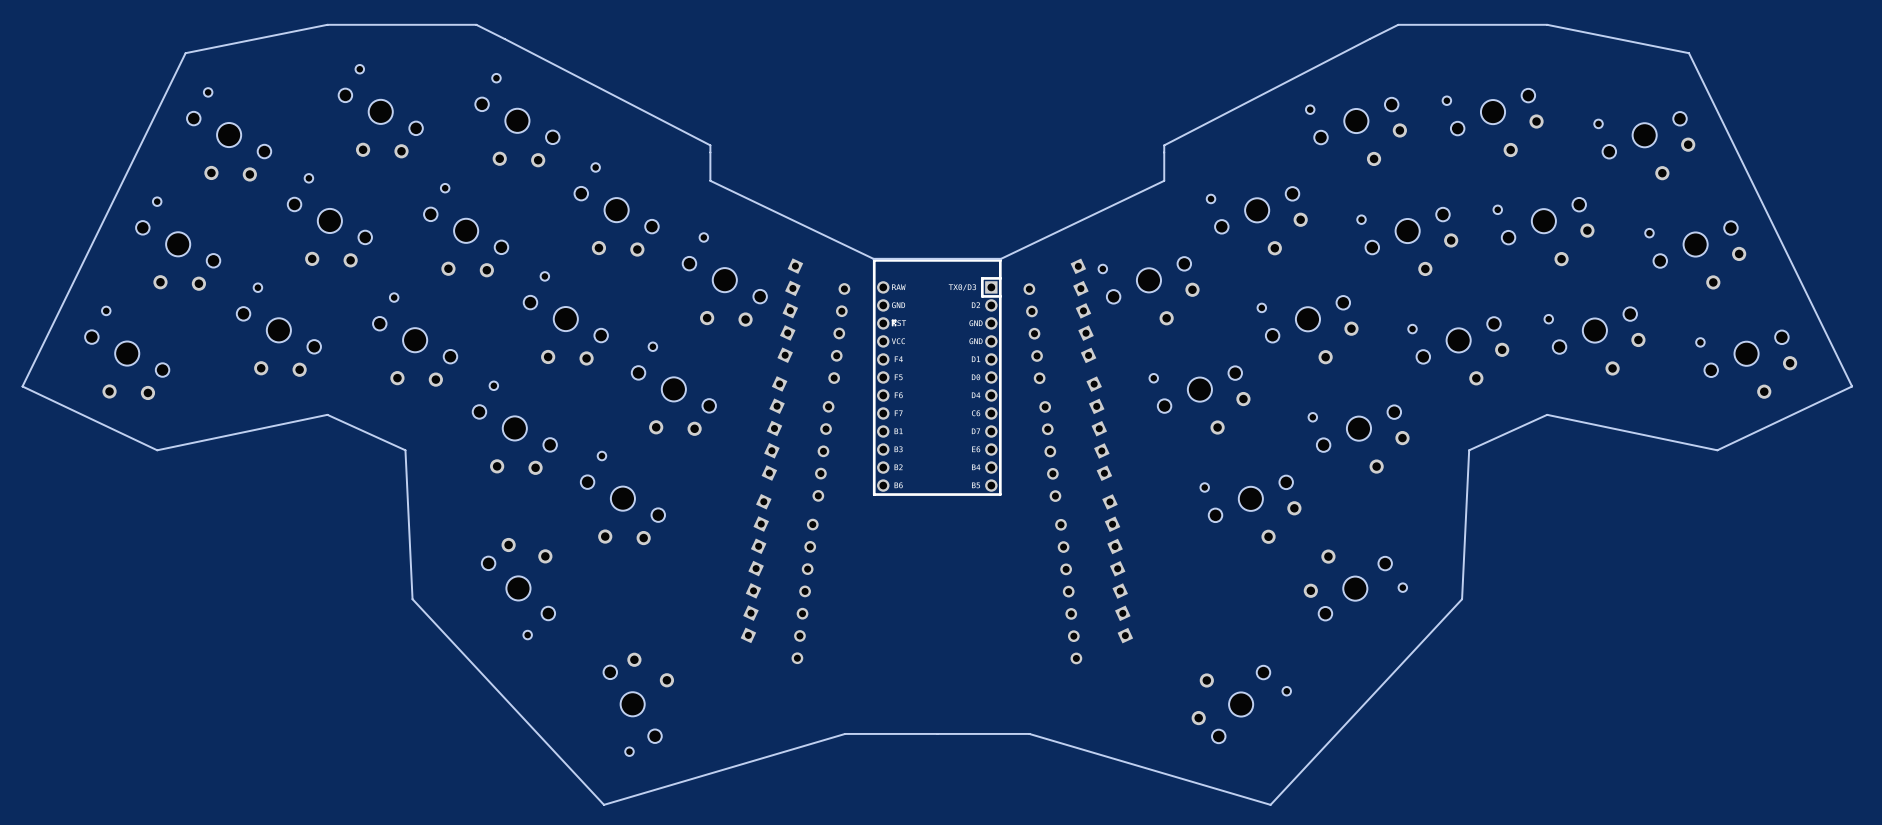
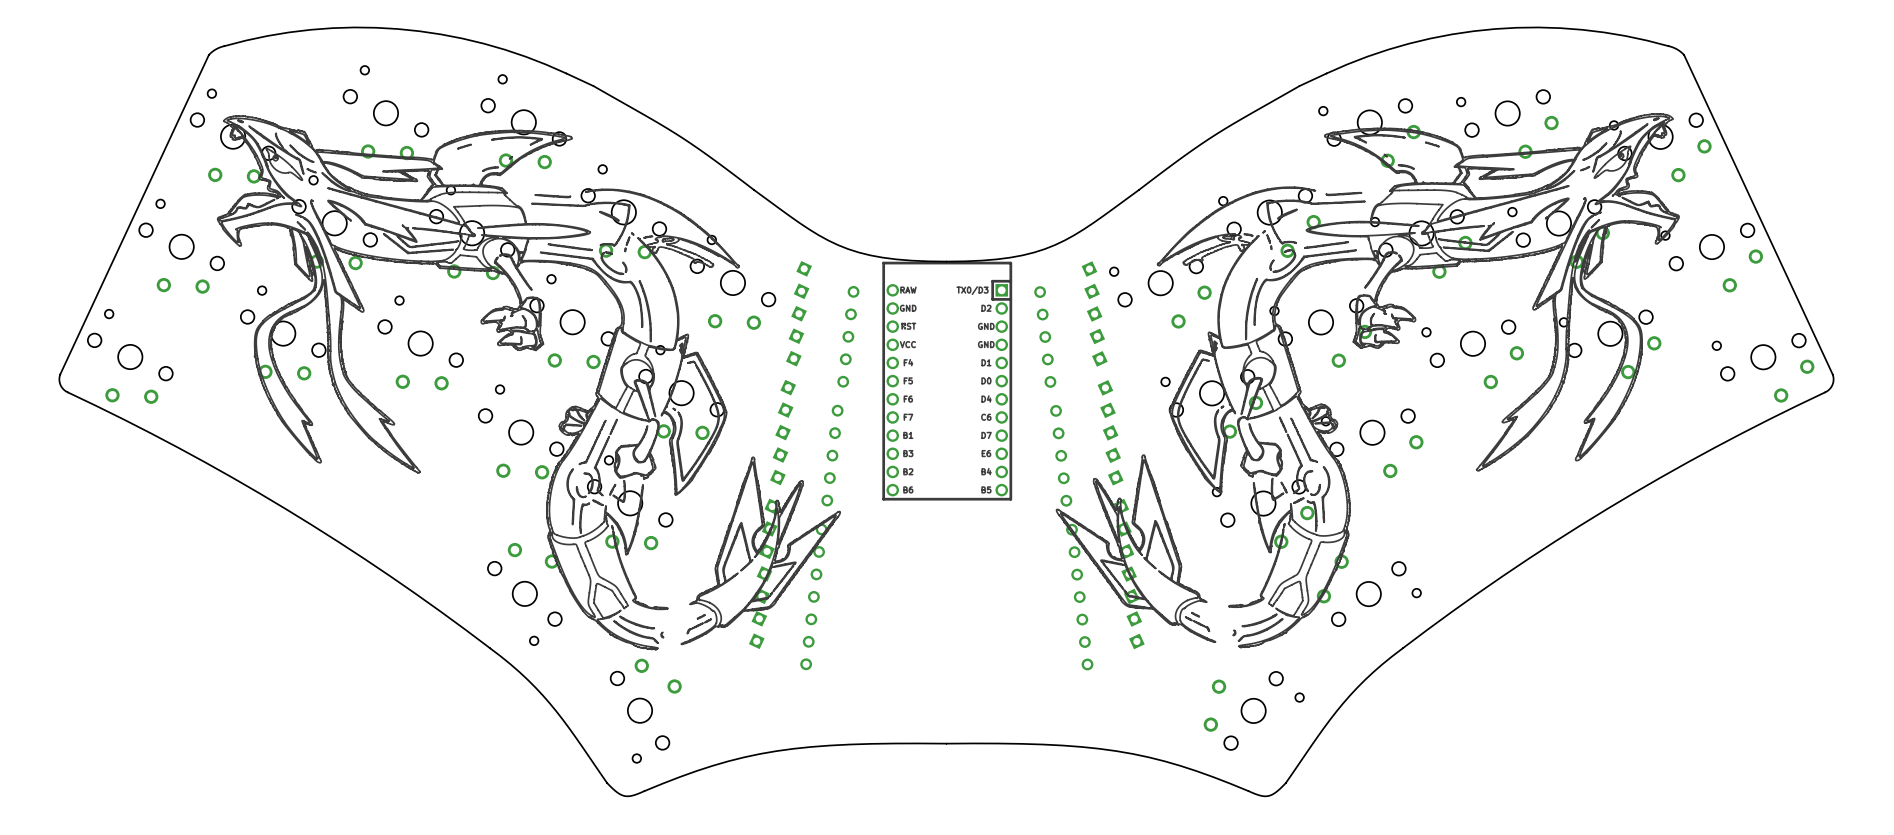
board edge: (1547, 24) (1689, 53) (1852, 386) (1717, 450) (1547, 414) (1469, 450) (1462, 599) (1270, 804) (1029, 733) (845, 733) (604, 804) (412, 599) (405, 450) (327, 414) (157, 450) (22, 386) (185, 53) (327, 24) (476, 24) (710, 145) (710, 180) (873, 258) (1001, 258) (1164, 180) (1164, 145) (1398, 24) (1547, 24) -> (1668, 46) (1684, 54) (1832, 374) (1831, 386) (1826, 391) (1741, 433) (1633, 493) (1528, 558) (1452, 611) (1392, 656) (1357, 687) (1330, 719) (1285, 783) (1276, 792) (1268, 796) (1257, 794) (1180, 765) (1132, 753) (1062, 745) (973, 743) (849, 744) (776, 751) (728, 761) (679, 777) (635, 794) (622, 795) (607, 783) (562, 719) (535, 687) (510, 664) (465, 629) (389, 575) (285, 509) (178, 447) (66, 391) (59, 382) (60, 374) (208, 54) (221, 47) (267, 36) (310, 29) (376, 27) (441, 34) (504, 49) (546, 64) (593, 86) (659, 123) (699, 149) (799, 222) (828, 240) (858, 252) (882, 257) (946, 261) (1010, 257) (1034, 252) (1064, 240) (1093, 222) (1193, 149) (1233, 123) (1299, 86) (1346, 64) (1388, 49) (1451, 34) (1495, 29) (1538, 27) (1604, 32) (1668, 46)
line: none -> (1657, 113) (1640, 115) (1613, 125) (1592, 129) (1581, 148) (1464, 157) (1459, 147) (1452, 141) (1415, 130) (1375, 128) (1325, 134) (1326, 137) (1348, 142) (1367, 151) (1396, 172) (1406, 172) (1411, 175) (1414, 180) (1415, 182) (1393, 187) (1389, 191) (1391, 192) (1374, 207) (1371, 220) (1375, 207) (1379, 205) (1402, 203) (1442, 204) (1422, 232) (1422, 234) (1427, 233) (1433, 246) (1419, 247) (1411, 237) (1398, 235) (1414, 232) (1351, 235) (1309, 230) (1323, 225) (1349, 222) (1369, 222) (1418, 225) (1417, 225) (1370, 221) (1354, 221) (1325, 224) (1307, 229) (1306, 230) (1308, 231) (1322, 234) (1368, 237) (1375, 258) (1328, 260) (1311, 264) (1301, 269) (1285, 285) (1275, 302) (1272, 314) (1274, 329) (1248, 343) (1223, 347) (1219, 329) (1219, 312) (1223, 291) (1230, 272) (1243, 252) (1258, 235) (1249, 243) (1239, 240) (1241, 236) (1234, 234) (1212, 237) (1191, 245) (1162, 260) (1198, 224) (1235, 201) (1256, 193) (1275, 189) (1310, 189) (1294, 187) (1272, 188) (1254, 192) (1236, 199) (1216, 210) (1191, 228) (1157, 263) (1159, 265) (1186, 248) (1217, 236) (1220, 240) (1229, 242) (1201, 251) (1183, 261) (1183, 264) (1186, 264) (1198, 259) (1201, 261) (1202, 257) (1207, 254) (1232, 245) (1237, 245) (1240, 250) (1243, 250) (1232, 267) (1223, 286) (1218, 310) (1219, 336) (1208, 333) (1213, 354) (1198, 350) (1170, 409) (1171, 418) (1181, 441) (1205, 479) (1221, 492) (1227, 439) (1223, 430) (1223, 420) (1229, 412) (1232, 410) (1235, 413) (1220, 376) (1214, 355) (1216, 348) (1215, 342) (1217, 343) (1214, 341) (1214, 350) (1211, 335) (1219, 338) (1222, 346) (1223, 347) (1248, 345) (1251, 353) (1245, 362) (1242, 374) (1243, 380) (1246, 385) (1243, 374) (1249, 362) (1262, 357) (1273, 363) (1274, 368) (1272, 378) (1261, 388) (1273, 410) (1249, 418) (1273, 411) (1296, 396) (1318, 435) (1336, 463) (1344, 485) (1347, 513) (1342, 531) (1323, 535) (1307, 531) (1292, 519) (1290, 504) (1290, 510) (1280, 520) (1275, 528) (1269, 548) (1260, 522) (1253, 483) (1258, 521) (1269, 552) (1276, 529) (1289, 512) (1290, 514) (1288, 523) (1297, 532) (1311, 541) (1298, 573) (1280, 584) (1268, 603) (1272, 606) (1284, 588) (1299, 581) (1302, 600) (1293, 615) (1275, 608) (1287, 615) (1299, 617) (1289, 627) (1274, 636) (1238, 646) (1258, 645) (1281, 635) (1309, 613) (1323, 595) (1336, 569) (1348, 535) (1346, 528) (1349, 504) (1346, 480) (1338, 461) (1317, 431) (1330, 432) (1336, 427) (1337, 423) (1331, 417) (1330, 409) (1325, 405) (1320, 404) (1309, 409) (1301, 402) (1298, 395) (1300, 391) (1299, 387) (1282, 331) (1275, 321) (1277, 303) (1288, 285) (1300, 271) (1317, 264) (1346, 259) (1375, 260) (1379, 265) (1365, 287) (1380, 266) (1386, 254) (1397, 253) (1392, 251) (1386, 253) (1379, 263) (1378, 251) (1383, 242) (1395, 236) (1409, 240) (1413, 248) (1411, 257) (1403, 265) (1392, 270) (1402, 260) (1400, 257) (1398, 255) (1400, 259) (1382, 282) (1374, 301) (1370, 297) (1376, 306) (1363, 311) (1358, 324) (1358, 299) (1361, 296) (1369, 296) (1359, 295) (1357, 299) (1356, 331) (1353, 341) (1360, 348) (1370, 345) (1378, 348) (1385, 342) (1398, 342) (1386, 331) (1386, 329) (1399, 329) (1397, 323) (1400, 319) (1413, 321) (1415, 320) (1403, 307) (1390, 304) (1378, 307) (1377, 304) (1377, 297) (1381, 285) (1391, 272) (1404, 268) (1456, 266) (1463, 260) (1474, 261) (1516, 258) (1542, 253) (1562, 245) (1533, 307) (1535, 309) (1554, 296) (1554, 319) (1556, 335) (1555, 356) (1550, 373) (1534, 393) (1502, 420) (1504, 422) (1513, 419) (1476, 469) (1478, 470) (1494, 461) (1526, 437) (1548, 412) (1558, 394) (1564, 382) (1562, 382) (1568, 362) (1568, 330) (1572, 277) (1575, 288) (1582, 297) (1619, 320) (1624, 328) (1626, 337) (1623, 354) (1616, 372) (1584, 421) (1585, 423) (1592, 420) (1575, 458) (1578, 460) (1596, 441) (1619, 412) (1632, 386) (1642, 354) (1641, 331) (1633, 318) (1583, 287) (1581, 275) (1590, 245) (1584, 279) (1601, 262) (1603, 240) (1607, 226) (1624, 222) (1655, 226) (1658, 232) (1656, 243) (1672, 229) (1678, 217) (1678, 215) (1668, 211) (1651, 192) (1632, 191) (1617, 193) (1620, 190) (1628, 187) (1627, 179) (1637, 176) (1635, 170) (1636, 164) (1654, 135) (1662, 137) (1666, 134) (1663, 126) (1672, 118) (1667, 114) (1657, 113)
line: none -> (239, 116) (255, 117) (283, 127) (304, 131) (315, 150) (432, 159) (436, 150) (444, 144) (481, 132) (520, 130) (570, 136) (570, 139) (548, 144) (528, 153) (500, 174) (490, 174) (485, 177) (482, 182) (481, 184) (503, 189) (506, 193) (504, 195) (521, 209) (525, 222) (521, 209) (517, 207) (493, 205) (454, 206) (474, 234) (474, 236) (469, 235) (463, 248) (476, 249) (485, 240) (498, 237) (481, 235) (545, 237) (587, 232) (573, 227) (547, 224) (527, 224) (478, 228) (478, 227) (526, 223) (542, 223) (570, 226) (589, 231) (590, 232) (588, 233) (573, 236) (528, 239) (521, 260) (568, 262) (585, 266) (595, 271) (611, 288) (621, 304) (624, 316) (622, 331) (648, 345) (673, 349) (677, 332) (677, 314) (673, 293) (666, 275) (653, 255) (638, 238) (647, 245) (657, 242) (655, 238) (661, 236) (683, 239) (705, 247) (733, 262) (697, 226) (661, 203) (640, 195) (621, 191) (586, 191) (602, 189) (623, 190) (642, 194) (660, 201) (680, 212) (704, 231) (739, 265) (737, 267) (709, 251) (679, 239) (675, 242) (666, 244) (695, 254) (713, 263) (712, 266) (710, 267) (698, 261) (695, 263) (694, 259) (689, 256) (664, 247) (659, 247) (656, 253) (652, 252) (664, 269) (673, 288) (678, 312) (677, 338) (688, 335) (683, 356) (697, 353) (726, 411) (724, 420) (714, 443) (691, 481) (675, 495) (669, 441) (673, 432) (673, 422) (667, 414) (664, 412) (661, 415) (676, 379) (681, 357) (679, 350) (681, 344) (679, 345) (682, 343) (682, 353) (685, 337) (676, 340) (674, 348) (673, 349) (648, 347) (645, 355) (651, 364) (654, 376) (653, 383) (650, 387) (653, 377) (647, 364) (634, 359) (623, 366) (622, 370) (624, 380) (635, 390) (623, 412) (647, 420) (623, 413) (600, 398) (578, 437) (559, 465) (552, 487) (549, 516) (554, 533) (573, 538) (589, 533) (604, 521) (605, 506) (606, 512) (616, 522) (621, 530) (627, 551) (636, 524) (643, 485) (637, 524) (627, 554) (620, 531) (607, 514) (606, 516) (608, 525) (599, 534) (585, 543) (598, 575) (616, 586) (627, 605) (624, 608) (612, 590) (597, 583) (593, 602) (603, 617) (620, 610) (609, 617) (597, 619) (607, 629) (622, 638) (658, 648) (638, 647) (615, 637) (587, 615) (573, 597) (559, 571) (548, 537) (549, 530) (546, 506) (550, 483) (557, 463) (578, 433) (566, 434) (560, 430) (559, 425) (565, 419) (566, 411) (571, 407) (576, 406) (587, 411) (595, 404) (598, 397) (596, 394) (596, 389) (614, 333) (621, 323) (619, 305) (607, 287) (595, 273) (579, 266) (549, 262) (521, 262) (517, 267) (531, 289) (516, 268) (510, 256) (499, 255) (504, 254) (509, 255) (516, 265) (518, 253) (512, 244) (501, 238) (487, 242) (483, 251) (485, 259) (493, 268) (504, 272) (494, 262) (495, 259) (498, 257) (496, 261) (514, 284) (522, 303) (526, 299) (520, 308) (533, 313) (538, 326) (538, 301) (535, 298) (526, 298) (537, 297) (539, 301) (540, 333) (543, 344) (535, 350) (526, 347) (518, 350) (511, 345) (497, 344) (510, 333) (510, 331) (497, 331) (499, 325) (496, 322) (483, 323) (481, 322) (493, 309) (506, 306) (517, 309) (519, 306) (519, 299) (514, 287) (505, 274) (492, 270) (440, 268) (433, 262) (421, 263) (380, 260) (353, 255) (334, 248) (363, 310) (361, 311) (342, 298) (342, 321) (340, 337) (341, 358) (346, 375) (362, 395) (393, 422) (392, 424) (383, 421) (420, 471) (417, 472) (402, 463) (370, 439) (348, 414) (337, 396) (332, 384) (334, 384) (328, 364) (328, 332) (323, 279) (320, 290) (313, 299) (277, 322) (272, 330) (270, 339) (272, 356) (280, 375) (312, 423) (310, 425) (304, 422) (320, 460) (318, 462) (300, 443) (277, 414) (264, 388) (254, 356) (255, 333) (263, 320) (313, 289) (315, 277) (306, 247) (312, 281) (295, 264) (293, 242) (289, 228) (272, 224) (241, 228) (238, 235) (240, 245) (224, 231) (217, 219) (218, 217) (228, 213) (245, 194) (264, 193) (279, 195) (276, 192) (268, 189) (269, 181) (259, 178) (261, 172) (259, 166) (242, 137) (234, 140) (230, 136) (233, 128) (224, 120) (229, 117) (239, 116)
line: none -> (1666, 116) (1653, 116) (1633, 120) (1600, 134) (1582, 148) (1565, 174) (1546, 188) (1556, 184) (1574, 170) (1554, 186) (1522, 195) (1460, 199) (1447, 207) (1437, 220) (1568, 186) (1430, 224) (1423, 232) (1483, 226) (1435, 232) (1436, 241) (1441, 249) (1453, 258) (1487, 258) (1531, 252) (1565, 242) (1584, 203) (1536, 306) (1560, 289) (1569, 258) (1578, 234) (1585, 221) (1589, 217) (1594, 215) (1587, 221) (1580, 233) (1561, 289) (1555, 295) (1557, 347) (1552, 373) (1540, 390) (1507, 418) (1517, 416) (1482, 466) (1504, 452) (1527, 433) (1546, 410) (1557, 390) (1565, 361) (1567, 318) (1572, 267) (1578, 248) (1587, 231) (1616, 221) (1638, 221) (1660, 226) (1658, 240) (1674, 221) (1674, 219) (1619, 203) (1606, 201) (1595, 204) (1611, 190) (1622, 177) (1641, 138) (1653, 127) (1669, 118) (1666, 116)
line: none -> (1658, 118) (1657, 119) (1653, 120) (1655, 118) (1658, 118)
line: none -> (230, 119) (227, 120) (243, 129) (255, 140) (274, 179) (285, 192) (301, 206) (290, 204) (277, 205) (222, 221) (222, 224) (238, 242) (236, 228) (258, 223) (279, 223) (309, 233) (318, 250) (324, 270) (329, 320) (331, 363) (339, 393) (350, 413) (369, 435) (392, 454) (414, 468) (379, 418) (389, 421) (356, 392) (344, 375) (338, 349) (341, 297) (335, 291) (316, 235) (309, 223) (302, 217) (310, 223) (317, 236) (336, 291) (360, 308) (312, 205) (331, 244) (365, 255) (409, 260) (443, 260) (455, 252) (460, 243) (461, 234) (412, 228) (472, 234) (465, 226) (328, 188) (459, 222) (449, 210) (436, 201) (374, 197) (364, 195) (342, 188) (332, 182) (322, 172) (340, 186) (350, 190) (331, 176) (314, 150) (296, 136) (263, 122) (243, 118) (230, 119)
line: none -> (238, 120) (239, 121) (242, 122) (241, 121) (238, 120)
line: none -> (1646, 124) (1597, 157) (1593, 171) (1597, 157) (1646, 124)
line: none -> (1663, 123) (1664, 122) (1643, 137) (1621, 180) (1611, 192) (1599, 201) (1616, 202) (1656, 214) (1677, 217) (1663, 211) (1658, 206) (1650, 206) (1647, 203) (1640, 205) (1636, 204) (1622, 197) (1638, 204) (1648, 201) (1650, 205) (1658, 205) (1662, 210) (1667, 212) (1651, 194) (1634, 192) (1619, 196) (1614, 193) (1619, 189) (1626, 186) (1626, 178) (1634, 175) (1633, 167) (1636, 159) (1655, 131) (1660, 126) (1654, 133) (1661, 135) (1661, 133) (1664, 132) (1661, 125) (1663, 123)
line: none -> (233, 126) (235, 127) (232, 135) (234, 135) (235, 138) (241, 136) (236, 128) (241, 133) (259, 161) (262, 169) (261, 177) (270, 180) (270, 188) (277, 191) (282, 195) (276, 198) (262, 195) (245, 196) (229, 214) (233, 212) (238, 207) (245, 208) (248, 203) (258, 206) (274, 199) (260, 207) (256, 207) (249, 205) (245, 208) (238, 208) (233, 213) (219, 219) (239, 216) (279, 204) (296, 203) (285, 194) (275, 182) (253, 139) (232, 124) (233, 126)
line: none -> (249, 126) (269, 141) (298, 160) (303, 173) (299, 159) (249, 126)
line: none -> (1606, 128) (1592, 132) (1587, 141) (1606, 129) (1606, 128)
line: none -> (1382, 130) (1330, 135) (1366, 149) (1396, 171) (1409, 172) (1417, 183) (1458, 183) (1466, 174) (1465, 168) (1459, 167) (1461, 173) (1454, 182) (1460, 172) (1458, 167) (1454, 166) (1462, 159) (1458, 148) (1453, 144) (1419, 133) (1382, 130)
line: none -> (290, 130) (304, 134) (309, 143) (290, 131) (290, 130)
line: none -> (1620, 131) (1620, 133) (1619, 137) (1613, 145) (1620, 131)
line: none -> (516, 132) (476, 135) (442, 146) (438, 150) (433, 162) (442, 168) (438, 169) (436, 174) (442, 184) (434, 175) (436, 169) (431, 170) (430, 177) (437, 185) (479, 185) (487, 174) (500, 173) (530, 151) (566, 138) (516, 132)
line: none -> (275, 133) (275, 135) (277, 139) (282, 147) (275, 133)
line: none -> (1364, 135) (1386, 135) (1404, 137) (1378, 135) (1357, 137) (1366, 142) (1354, 137) (1364, 135)
line: none -> (532, 137) (542, 139) (530, 144) (539, 139) (518, 137) (491, 139) (510, 137) (532, 137)
line: none -> (1425, 142) (1431, 143) (1435, 145) (1426, 142) (1425, 142)
line: none -> (1606, 143) (1597, 152) (1588, 157) (1582, 159) (1597, 151) (1606, 143)
line: none -> (471, 144) (465, 145) (461, 147) (470, 145) (471, 144)
line: none -> (290, 145) (298, 154) (308, 160) (313, 162) (298, 153) (290, 145)
line: none -> (1436, 145) (1437, 146) (1439, 146) (1437, 145) (1436, 145)
line: none -> (460, 147) (459, 148) (457, 148) (459, 148) (460, 147)
line: none -> (1630, 147) (1630, 146) (1610, 159) (1594, 178) (1605, 170) (1615, 170) (1621, 167) (1626, 161) (1630, 147)
line: none -> (266, 149) (270, 163) (275, 169) (281, 172) (291, 172) (302, 180) (286, 161) (266, 148) (266, 149)
line: none -> (1580, 150) (1574, 159) (1558, 162) (1531, 174) (1484, 177) (1497, 169) (1513, 169) (1457, 165) (1470, 158) (1580, 150)
line: none -> (316, 152) (322, 161) (338, 164) (365, 176) (412, 179) (399, 172) (382, 171) (439, 167) (426, 160) (316, 152)
line: none -> (1621, 153) (1618, 155) (1621, 158) (1623, 156) (1621, 153)
line: none -> (1384, 154) (1384, 154) (1387, 156) (1385, 155) (1384, 154)
line: none -> (275, 155) (273, 158) (275, 160) (277, 157) (275, 155)
line: none -> (1621, 155) (1621, 155) (1620, 155) (1620, 155) (1621, 155)
line: none -> (275, 157) (275, 157) (276, 157) (276, 157) (275, 157)
line: none -> (512, 156) (510, 158) (509, 158) (512, 156) (512, 156)
line: none -> (1572, 161) (1565, 173) (1556, 179) (1528, 192) (1477, 198) (1463, 182) (1469, 174) (1468, 168) (1495, 169) (1480, 179) (1513, 178) (1534, 175) (1557, 164) (1572, 161)
line: none -> (323, 164) (339, 166) (362, 177) (383, 180) (416, 181) (401, 171) (428, 170) (427, 176) (433, 184) (419, 200) (368, 194) (339, 182) (331, 175) (323, 164)
line: none -> (1401, 164) (1398, 165) (1413, 168) (1409, 166) (1401, 164)
line: none -> (495, 167) (498, 167) (482, 171) (487, 168) (495, 167)
line: none -> (1589, 167) (1588, 167) (1580, 170) (1584, 169) (1589, 167)
line: none -> (307, 169) (308, 169) (316, 172) (312, 171) (307, 169)
line: none -> (1439, 184) (1464, 185) (1474, 198) (1468, 198) (1456, 192) (1446, 190) (1392, 190) (1404, 185) (1439, 184)
line: none -> (457, 186) (492, 187) (504, 192) (450, 192) (440, 194) (428, 200) (422, 200) (432, 187) (457, 186)
line: none -> (1312, 189) (1313, 190) (1315, 190) (1312, 190) (1311, 189) (1312, 189)
line: none -> (1361, 192) (1330, 195) (1327, 195) (1326, 194) (1361, 192)
line: none -> (535, 195) (566, 197) (569, 197) (570, 196) (535, 195)
line: none -> (1613, 194) (1613, 194) (1612, 196) (1613, 195) (1613, 194)
line: none -> (283, 196) (283, 196) (284, 198) (283, 197) (283, 196)
line: none -> (1585, 198) (1583, 199) (1584, 202) (1585, 200) (1585, 198)
line: none -> (1566, 198) (1545, 207) (1531, 221) (1482, 238) (1491, 225) (1488, 225) (1480, 239) (1531, 222) (1546, 208) (1566, 199) (1548, 216) (1568, 198) (1566, 198)
line: none -> (311, 200) (312, 201) (312, 205) (311, 202) (311, 200)
line: none -> (329, 200) (327, 200) (348, 218) (330, 201) (350, 210) (365, 224) (416, 241) (408, 227) (405, 227) (414, 240) (365, 223) (351, 210) (329, 200)
line: none -> (1293, 200) (1306, 202) (1283, 201) (1268, 204) (1271, 222) (1279, 239) (1269, 220) (1267, 203) (1279, 200) (1293, 200)
line: none -> (1364, 201) (1314, 204) (1307, 202) (1314, 203) (1364, 201)
line: none -> (610, 202) (621, 203) (629, 205) (627, 222) (622, 233) (617, 241) (625, 224) (628, 206) (613, 203) (590, 204) (610, 202)
line: none -> (532, 203) (582, 205) (589, 204) (582, 206) (532, 203)
line: none -> (1296, 209) (1295, 210) (1277, 218) (1284, 214) (1296, 209)
line: none -> (600, 211) (601, 213) (618, 220) (612, 216) (600, 211)
line: none -> (1600, 212) (1599, 213) (1597, 213) (1599, 212) (1600, 212)
line: none -> (1596, 213) (1595, 214) (1594, 214) (1597, 213) (1596, 213)
line: none -> (295, 214) (297, 214) (299, 215) (297, 215) (295, 214)
line: none -> (300, 216) (299, 216) (302, 217) (301, 216) (300, 216)
line: none -> (1546, 217) (1547, 217) (1545, 218) (1546, 218) (1546, 217)
line: none -> (349, 219) (349, 219) (351, 220) (350, 220) (349, 219)
line: none -> (1599, 219) (1593, 225) (1591, 227) (1593, 225) (1599, 219)
line: none -> (297, 222) (302, 227) (305, 229) (303, 227) (297, 222)
line: none -> (1494, 223) (1493, 224) (1492, 224) (1494, 223) (1494, 223)
line: none -> (402, 225) (403, 226) (403, 226) (402, 225) (402, 225)
line: none -> (1604, 226) (1600, 261) (1587, 274) (1593, 241) (1597, 231) (1583, 260) (1581, 285) (1591, 295) (1621, 311) (1633, 321) (1639, 332) (1639, 349) (1634, 374) (1619, 408) (1602, 432) (1579, 456) (1594, 418) (1587, 420) (1616, 378) (1623, 360) (1627, 345) (1626, 331) (1620, 319) (1613, 313) (1586, 300) (1579, 292) (1575, 282) (1576, 265) (1589, 233) (1604, 226)
line: none -> (291, 229) (296, 263) (309, 276) (303, 243) (299, 233) (313, 262) (315, 287) (305, 297) (275, 313) (262, 323) (256, 334) (256, 351) (262, 377) (277, 410) (293, 434) (317, 459) (302, 420) (309, 422) (280, 380) (272, 362) (269, 347) (270, 333) (276, 321) (283, 315) (309, 302) (317, 294) (321, 284) (320, 267) (307, 236) (291, 229)
line: none -> (1264, 231) (1264, 231) (1263, 232) (1264, 231) (1264, 231)
line: none -> (1512, 231) (1488, 251) (1443, 247) (1487, 250) (1512, 231)
line: none -> (631, 233) (632, 233) (633, 234) (632, 233) (631, 233)
line: none -> (1588, 233) (1587, 234) (1575, 261) (1580, 246) (1588, 233)
line: none -> (384, 233) (407, 253) (453, 249) (409, 252) (384, 233)
line: none -> (1245, 234) (1244, 234) (1248, 234) (1246, 234) (1245, 234)
line: none -> (1499, 233) (1486, 244) (1438, 239) (1485, 245) (1489, 243) (1499, 233)
line: none -> (1248, 234) (1250, 235) (1252, 235) (1251, 235) (1248, 234)
line: none -> (1267, 235) (1268, 239) (1270, 242) (1269, 240) (1267, 235)
line: none -> (308, 235) (308, 236) (321, 263) (316, 248) (308, 235)
line: none -> (397, 235) (410, 246) (458, 241) (411, 247) (407, 245) (397, 235)
line: none -> (651, 236) (650, 236) (648, 237) (652, 236) (651, 236)
line: none -> (1227, 236) (1232, 236) (1234, 239) (1223, 237) (1227, 236)
line: none -> (629, 237) (627, 242) (626, 245) (628, 241) (629, 237)
line: none -> (648, 236) (646, 237) (644, 237) (645, 237) (648, 236)
line: none -> (502, 237) (512, 242) (519, 252) (524, 251) (527, 238) (502, 237)
line: none -> (669, 238) (673, 239) (662, 241) (663, 238) (669, 238)
line: none -> (1279, 240) (1281, 242) (1290, 241) (1296, 242) (1282, 243) (1279, 240)
line: none -> (1348, 242) (1322, 245) (1304, 247) (1306, 247) (1348, 242)
line: none -> (617, 242) (614, 244) (606, 243) (600, 245) (614, 245) (617, 242)
line: none -> (548, 244) (573, 248) (592, 250) (590, 249) (548, 244)
line: none -> (1242, 244) (1244, 249) (1248, 245) (1248, 244) (1242, 244)
line: none -> (1271, 246) (1271, 248) (1271, 249) (1271, 246) (1271, 246)
line: none -> (654, 246) (648, 246) (647, 247) (651, 251) (654, 246)
line: none -> (625, 248) (625, 250) (625, 251) (625, 248) (625, 248)
line: none -> (1290, 250) (1287, 250) (1284, 252) (1290, 250) (1290, 250)
line: none -> (1356, 250) (1304, 257) (1294, 268) (1285, 276) (1277, 279) (1266, 280) (1257, 298) (1254, 325) (1256, 297) (1265, 279) (1275, 279) (1285, 275) (1303, 256) (1356, 250)
line: none -> (1292, 250) (1292, 250) (1294, 252) (1293, 251) (1292, 250)
line: none -> (1375, 250) (1373, 251) (1376, 258) (1377, 251) (1375, 250)
line: none -> (540, 252) (592, 258) (610, 277) (620, 281) (631, 281) (635, 288) (639, 299) (641, 314) (642, 327) (639, 301) (630, 282) (619, 281) (611, 278) (591, 259) (540, 252)
line: none -> (605, 252) (606, 252) (612, 254) (609, 252) (605, 252)
line: none -> (521, 253) (519, 253) (519, 260) (523, 254) (521, 253)
line: none -> (604, 252) (603, 253) (602, 254) (604, 252) (604, 252)
line: none -> (1294, 253) (1288, 264) (1273, 271) (1279, 270) (1288, 265) (1294, 258) (1294, 253)
line: none -> (1436, 253) (1420, 254) (1412, 263) (1405, 266) (1456, 264) (1459, 260) (1445, 261) (1436, 253)
line: none -> (460, 255) (451, 263) (436, 262) (440, 266) (491, 268) (484, 265) (476, 256) (460, 255)
line: none -> (601, 255) (602, 260) (608, 267) (616, 273) (623, 273) (608, 266) (601, 255)
line: none -> (1273, 260) (1270, 265) (1270, 268) (1271, 269) (1273, 260)
line: none -> (623, 262) (625, 267) (625, 272) (626, 267) (623, 262)
line: none -> (1257, 279) (1251, 292) (1248, 307) (1246, 321) (1246, 339) (1248, 308) (1257, 279)
line: none -> (639, 281) (648, 311) (650, 341) (648, 309) (639, 281)
line: none -> (1373, 306) (1365, 310) (1361, 316) (1361, 327) (1359, 326) (1355, 341) (1360, 345) (1364, 344) (1361, 344) (1360, 341) (1363, 330) (1362, 328) (1369, 327) (1369, 330) (1386, 326) (1371, 326) (1371, 324) (1397, 327) (1394, 321) (1397, 319) (1392, 318) (1391, 314) (1393, 317) (1413, 318) (1401, 308) (1390, 306) (1382, 309) (1385, 312) (1373, 306)
line: none -> (522, 309) (530, 312) (535, 318) (535, 329) (537, 329) (541, 343) (536, 347) (531, 346) (535, 346) (536, 343) (533, 332) (534, 330) (526, 329) (527, 332) (510, 328) (525, 328) (525, 326) (499, 329) (502, 323) (499, 321) (503, 320) (504, 316) (503, 320) (483, 320) (495, 311) (506, 308) (514, 311) (511, 314) (522, 309)
line: none -> (1374, 313) (1371, 318) (1371, 323) (1370, 318) (1374, 313)
line: none -> (1384, 313) (1385, 313) (1386, 314) (1385, 313) (1384, 313)
line: none -> (512, 315) (511, 316) (510, 316) (511, 315) (512, 315)
line: none -> (522, 315) (525, 320) (525, 325) (525, 320) (522, 315)
line: none -> (1276, 325) (1274, 330) (1256, 341) (1260, 351) (1269, 355) (1275, 365) (1274, 375) (1269, 384) (1281, 405) (1298, 391) (1279, 331) (1276, 325)
line: none -> (620, 327) (616, 333) (598, 393) (615, 408) (627, 386) (622, 377) (621, 368) (627, 357) (636, 353) (640, 344) (622, 332) (620, 327)
line: none -> (1374, 330) (1362, 332) (1361, 342) (1379, 345) (1383, 341) (1375, 342) (1374, 338) (1375, 334) (1376, 341) (1396, 340) (1392, 335) (1384, 332) (1383, 329) (1374, 330)
line: none -> (522, 332) (513, 332) (512, 334) (504, 337) (500, 342) (520, 343) (520, 337) (521, 344) (513, 343) (517, 347) (534, 344) (533, 334) (522, 332)
line: none -> (1200, 352) (1214, 356) (1222, 385) (1232, 408) (1225, 414) (1221, 423) (1224, 439) (1219, 491) (1208, 479) (1195, 460) (1180, 433) (1172, 414) (1176, 399) (1200, 352)
line: none -> (696, 354) (682, 358) (674, 387) (664, 410) (671, 416) (675, 425) (671, 441) (677, 493) (688, 481) (701, 462) (716, 435) (724, 416) (720, 401) (696, 354)
line: none -> (1203, 359) (1201, 361) (1208, 360) (1207, 360) (1203, 359)
line: none -> (693, 361) (689, 362) (687, 362) (695, 363) (693, 361)
line: none -> (1200, 362) (1190, 382) (1181, 399) (1178, 410) (1177, 417) (1180, 427) (1187, 441) (1214, 478) (1219, 441) (1215, 421) (1218, 410) (1214, 419) (1218, 440) (1213, 476) (1191, 444) (1178, 418) (1182, 400) (1200, 362)
line: none -> (695, 365) (714, 402) (718, 420) (705, 447) (683, 478) (678, 442) (681, 429) (681, 421) (680, 415) (678, 412) (681, 423) (677, 443) (682, 481) (709, 443) (718, 420) (714, 401) (695, 365)
line: none -> (1260, 377) (1252, 378) (1248, 382) (1241, 414) (1250, 381) (1260, 379) (1248, 416) (1260, 388) (1262, 379) (1260, 377)
line: none -> (636, 380) (634, 381) (636, 390) (648, 419) (635, 381) (646, 383) (655, 416) (648, 384) (644, 381) (636, 380)
line: none -> (1222, 406) (1223, 406) (1221, 407) (1221, 407) (1222, 406)
line: none -> (1303, 407) (1307, 413) (1308, 414) (1308, 411) (1303, 407)
line: none -> (1320, 407) (1319, 408) (1312, 418) (1320, 408) (1324, 408) (1320, 407)
line: none -> (673, 408) (674, 409) (675, 409) (673, 408) (673, 408)
line: none -> (1316, 408) (1309, 410) (1310, 420) (1322, 416) (1328, 410) (1324, 406) (1316, 408)
line: none -> (576, 409) (572, 410) (576, 410) (579, 416) (584, 420) (576, 409)
line: none -> (592, 409) (589, 415) (588, 416) (587, 413) (592, 409)
line: none -> (580, 410) (572, 409) (568, 412) (574, 418) (586, 423) (587, 412) (580, 410)
line: none -> (1328, 412) (1329, 418) (1335, 423) (1334, 427) (1332, 428) (1333, 425) (1332, 423) (1331, 428) (1326, 431) (1314, 427) (1312, 421) (1328, 412)
line: none -> (568, 414) (584, 423) (582, 429) (569, 433) (565, 430) (564, 425) (563, 430) (562, 429) (561, 425) (567, 420) (568, 414)
line: none -> (1244, 416) (1248, 418) (1248, 419) (1246, 419) (1244, 416)
line: none -> (1243, 417) (1239, 421) (1239, 429) (1253, 458) (1258, 458) (1262, 450) (1251, 432) (1249, 423) (1258, 441) (1275, 443) (1280, 448) (1281, 450) (1280, 458) (1280, 453) (1278, 457) (1280, 466) (1280, 459) (1281, 461) (1281, 468) (1276, 475) (1259, 471) (1253, 473) (1252, 476) (1241, 466) (1246, 450) (1239, 431) (1237, 421) (1243, 417)
line: none -> (1280, 417) (1283, 425) (1283, 426) (1280, 419) (1280, 417)
line: none -> (1291, 418) (1292, 420) (1292, 421) (1292, 420) (1291, 418)
line: none -> (616, 419) (612, 427) (613, 428) (616, 421) (616, 419)
line: none -> (652, 419) (649, 421) (648, 421) (648, 420) (652, 419)
line: none -> (653, 419) (656, 420) (658, 423) (657, 434) (650, 452) (655, 468) (644, 479) (643, 475) (637, 473) (620, 477) (615, 471) (614, 463) (616, 461) (616, 468) (618, 459) (616, 455) (617, 459) (616, 460) (616, 451) (621, 445) (638, 444) (647, 425) (645, 434) (634, 452) (638, 460) (643, 461) (657, 431) (657, 423) (653, 419)
line: none -> (605, 420) (604, 422) (604, 423) (604, 422) (605, 420)
line: none -> (1293, 421) (1293, 423) (1294, 425) (1294, 424) (1293, 421)
line: none -> (1330, 422) (1330, 423) (1315, 423) (1323, 422) (1330, 422)
line: none -> (565, 424) (566, 425) (581, 425) (573, 424) (565, 424)
line: none -> (603, 424) (603, 425) (602, 427) (602, 426) (603, 424)
line: none -> (1284, 426) (1285, 429) (1286, 432) (1284, 429) (1284, 426)
line: none -> (1295, 426) (1295, 427) (1296, 428) (1295, 427) (1295, 426)
line: none -> (601, 428) (600, 429) (600, 430) (601, 429) (601, 428)
line: none -> (612, 429) (611, 431) (610, 434) (611, 431) (612, 429)
line: none -> (1296, 429) (1297, 431) (1298, 433) (1297, 431) (1296, 429)
line: none -> (600, 431) (599, 433) (598, 435) (599, 433) (600, 431)
line: none -> (1287, 434) (1301, 465) (1298, 469) (1297, 476) (1297, 483) (1299, 488) (1297, 475) (1302, 465) (1287, 434)
line: none -> (1298, 434) (1298, 435) (1299, 436) (1299, 434) (1298, 434)
line: none -> (598, 436) (597, 437) (596, 438) (597, 437) (598, 436)
line: none -> (609, 436) (595, 467) (598, 472) (599, 478) (599, 485) (597, 490) (599, 478) (594, 467) (609, 436)
line: none -> (1300, 437) (1310, 459) (1316, 461) (1317, 462) (1310, 460) (1300, 437)
line: none -> (596, 439) (586, 461) (580, 463) (579, 464) (586, 462) (596, 439)
line: none -> (1260, 443) (1263, 450) (1261, 457) (1258, 460) (1252, 459) (1247, 452) (1244, 467) (1250, 473) (1261, 470) (1276, 473) (1280, 469) (1277, 458) (1279, 449) (1275, 445) (1260, 443)
line: none -> (636, 445) (621, 447) (617, 451) (619, 460) (616, 471) (620, 475) (635, 472) (646, 475) (652, 469) (649, 454) (643, 461) (638, 462) (634, 459) (633, 452) (636, 445)
line: none -> (1144, 455) (1181, 564) (1178, 582) (1196, 592) (1200, 599) (1206, 602) (1196, 601) (1183, 608) (1180, 620) (1190, 629) (1215, 642) (1197, 635) (1180, 624) (1171, 624) (1153, 608) (1129, 606) (1124, 603) (1056, 511) (1056, 509) (1058, 509) (1107, 542) (1111, 555) (1121, 558) (1093, 483) (1094, 479) (1096, 479) (1116, 509) (1117, 501) (1120, 499) (1124, 523) (1139, 550) (1142, 536) (1132, 521) (1142, 456) (1144, 455)
line: none -> (752, 457) (754, 458) (764, 523) (754, 538) (757, 552) (772, 525) (776, 501) (779, 503) (780, 512) (800, 481) (802, 481) (802, 485) (774, 560) (785, 557) (789, 544) (837, 512) (839, 511) (839, 513) (772, 605) (766, 609) (743, 611) (724, 627) (716, 626) (699, 637) (681, 644) (705, 632) (716, 622) (713, 610) (700, 603) (690, 604) (696, 601) (699, 594) (718, 584) (715, 567) (752, 457)
line: none -> (1143, 462) (1143, 460) (1178, 563) (1176, 582) (1171, 579) (1173, 564) (1155, 520) (1146, 557) (1155, 523) (1172, 564) (1171, 578) (1158, 571) (1171, 581) (1198, 596) (1185, 601) (1178, 607) (1175, 615) (1177, 622) (1171, 623) (1143, 595) (1130, 574) (1120, 545) (1118, 524) (1119, 506) (1128, 534) (1136, 548) (1142, 555) (1139, 551) (1143, 544) (1144, 536) (1134, 523) (1143, 462)
line: none -> (753, 464) (762, 525) (752, 538) (753, 546) (756, 553) (754, 557) (768, 537) (777, 508) (778, 526) (776, 547) (766, 576) (753, 597) (725, 625) (719, 625) (721, 617) (717, 609) (711, 603) (698, 598) (724, 583) (737, 573) (725, 580) (724, 566) (740, 525) (750, 559) (741, 523) (723, 567) (724, 582) (719, 584) (717, 566) (752, 462) (753, 464)
line: none -> (1324, 467) (1328, 481) (1327, 490) (1322, 497) (1324, 522) (1323, 498) (1328, 489) (1329, 482) (1324, 467)
line: none -> (572, 469) (567, 483) (569, 492) (574, 499) (572, 524) (573, 501) (568, 491) (567, 484) (572, 469)
line: none -> (1312, 471) (1307, 472) (1304, 476) (1308, 491) (1304, 486) (1304, 477) (1307, 472) (1312, 471)
line: none -> (584, 473) (589, 474) (591, 475) (592, 479) (592, 488) (588, 493) (592, 478) (589, 474) (584, 473)
line: none -> (1272, 478) (1271, 493) (1273, 499) (1283, 493) (1273, 498) (1272, 478)
line: none -> (624, 480) (623, 500) (613, 495) (623, 502) (625, 495) (624, 480)
line: none -> (1096, 481) (1100, 496) (1119, 542) (1117, 515) (1096, 481)
line: none -> (1281, 482) (1282, 484) (1283, 485) (1281, 483) (1281, 482)
line: none -> (800, 483) (796, 498) (777, 544) (779, 517) (800, 483)
line: none -> (615, 484) (614, 486) (613, 487) (614, 486) (615, 484)
line: none -> (1320, 485) (1316, 493) (1310, 494) (1317, 493) (1320, 485)
line: none -> (1283, 486) (1285, 489) (1286, 492) (1285, 491) (1283, 486)
line: none -> (576, 487) (577, 491) (579, 495) (582, 497) (585, 496) (580, 495) (576, 487)
line: none -> (612, 488) (611, 491) (609, 494) (611, 493) (612, 488)
line: none -> (1298, 489) (1296, 491) (1293, 493) (1296, 491) (1298, 489)
line: none -> (598, 491) (600, 493) (602, 495) (600, 493) (598, 491)
line: none -> (1303, 498) (1298, 501) (1293, 503) (1301, 498) (1303, 498)
line: none -> (593, 500) (595, 500) (602, 505) (598, 503) (593, 500)
line: none -> (1307, 501) (1314, 503) (1316, 518) (1315, 530) (1314, 505) (1307, 501)
line: none -> (588, 503) (582, 505) (580, 520) (580, 532) (582, 507) (588, 503)
line: none -> (1063, 514) (1106, 543) (1110, 555) (1124, 562) (1131, 578) (1143, 598) (1128, 595) (1145, 599) (1151, 607) (1125, 602) (1060, 513) (1063, 514)
line: none -> (833, 516) (790, 545) (786, 558) (772, 564) (765, 580) (753, 600) (768, 598) (751, 601) (744, 609) (770, 605) (836, 515) (833, 516)
line: none -> (1284, 524) (1284, 525) (1283, 527) (1284, 525) (1284, 524)
line: none -> (612, 526) (612, 527) (612, 529) (612, 527) (612, 526)
line: none -> (1283, 529) (1276, 555) (1260, 594) (1260, 599) (1246, 605) (1229, 606) (1248, 605) (1263, 598) (1261, 594) (1276, 559) (1283, 529)
line: none -> (613, 531) (619, 557) (636, 596) (635, 601) (650, 607) (667, 608) (648, 607) (633, 601) (635, 596) (620, 561) (613, 531)
line: none -> (1346, 533) (1338, 558) (1323, 591) (1312, 607) (1301, 615) (1308, 601) (1306, 576) (1320, 542) (1337, 540) (1343, 537) (1344, 530) (1346, 533)
line: none -> (552, 535) (551, 532) (550, 539) (571, 590) (583, 608) (595, 617) (588, 603) (590, 578) (576, 545) (558, 542) (552, 535)
line: none -> (1144, 557) (1149, 562) (1155, 568) (1146, 558) (1144, 557)
line: none -> (752, 560) (747, 565) (741, 570) (749, 560) (752, 560)
line: none -> (1104, 560) (1119, 563) (1123, 564) (1100, 560) (1104, 560)
line: none -> (792, 562) (795, 562) (773, 567) (777, 565) (792, 562)
line: none -> (1103, 563) (1103, 564) (1104, 565) (1104, 564) (1103, 563)
line: none -> (792, 565) (793, 566) (792, 567) (792, 566) (792, 565)
line: none -> (1105, 565) (1108, 570) (1123, 589) (1113, 577) (1105, 565)
line: none -> (791, 567) (787, 572) (773, 591) (783, 579) (791, 567)
line: none -> (1124, 590) (1125, 591) (1125, 592) (1124, 590) (1124, 590)
line: none -> (771, 592) (771, 593) (770, 594) (772, 592) (771, 592)
line: none -> (1126, 593) (1127, 594) (1127, 594) (1126, 593) (1126, 593)
line: none -> (770, 595) (769, 596) (768, 596) (770, 595) (770, 595)
line: none -> (1191, 613) (1192, 612) (1199, 616) (1196, 615) (1191, 613)
line: none -> (1276, 614) (1259, 622) (1242, 626) (1258, 623) (1276, 614)
line: none -> (704, 615) (699, 617) (697, 618) (704, 615) (704, 615)
line: none -> (620, 616) (637, 624) (654, 628) (638, 625) (620, 616)
line: none -> (1185, 617) (1188, 618) (1192, 620) (1185, 616) (1185, 617)
line: none -> (710, 619) (708, 620) (704, 622) (711, 619) (710, 619)
line: none -> (1282, 619) (1262, 630) (1243, 636) (1238, 640) (1243, 636) (1265, 630) (1282, 619)
line: none -> (614, 621) (634, 632) (653, 638) (658, 643) (653, 638) (631, 632) (614, 621)
line: none -> (1193, 621) (1199, 623) (1205, 626) (1198, 623) (1193, 621)
line: none -> (702, 623) (697, 626) (691, 628) (698, 625) (702, 623)
line: none -> (1206, 626) (1208, 628) (1209, 631) (1207, 628) (1206, 626)
line: none -> (690, 629) (688, 630) (687, 633) (689, 630) (690, 629)
line: none -> (1234, 630) (1235, 633) (1233, 635) (1233, 630) (1234, 630)
line: none -> (662, 633) (662, 632) (661, 633) (661, 635) (663, 637) (662, 633)

